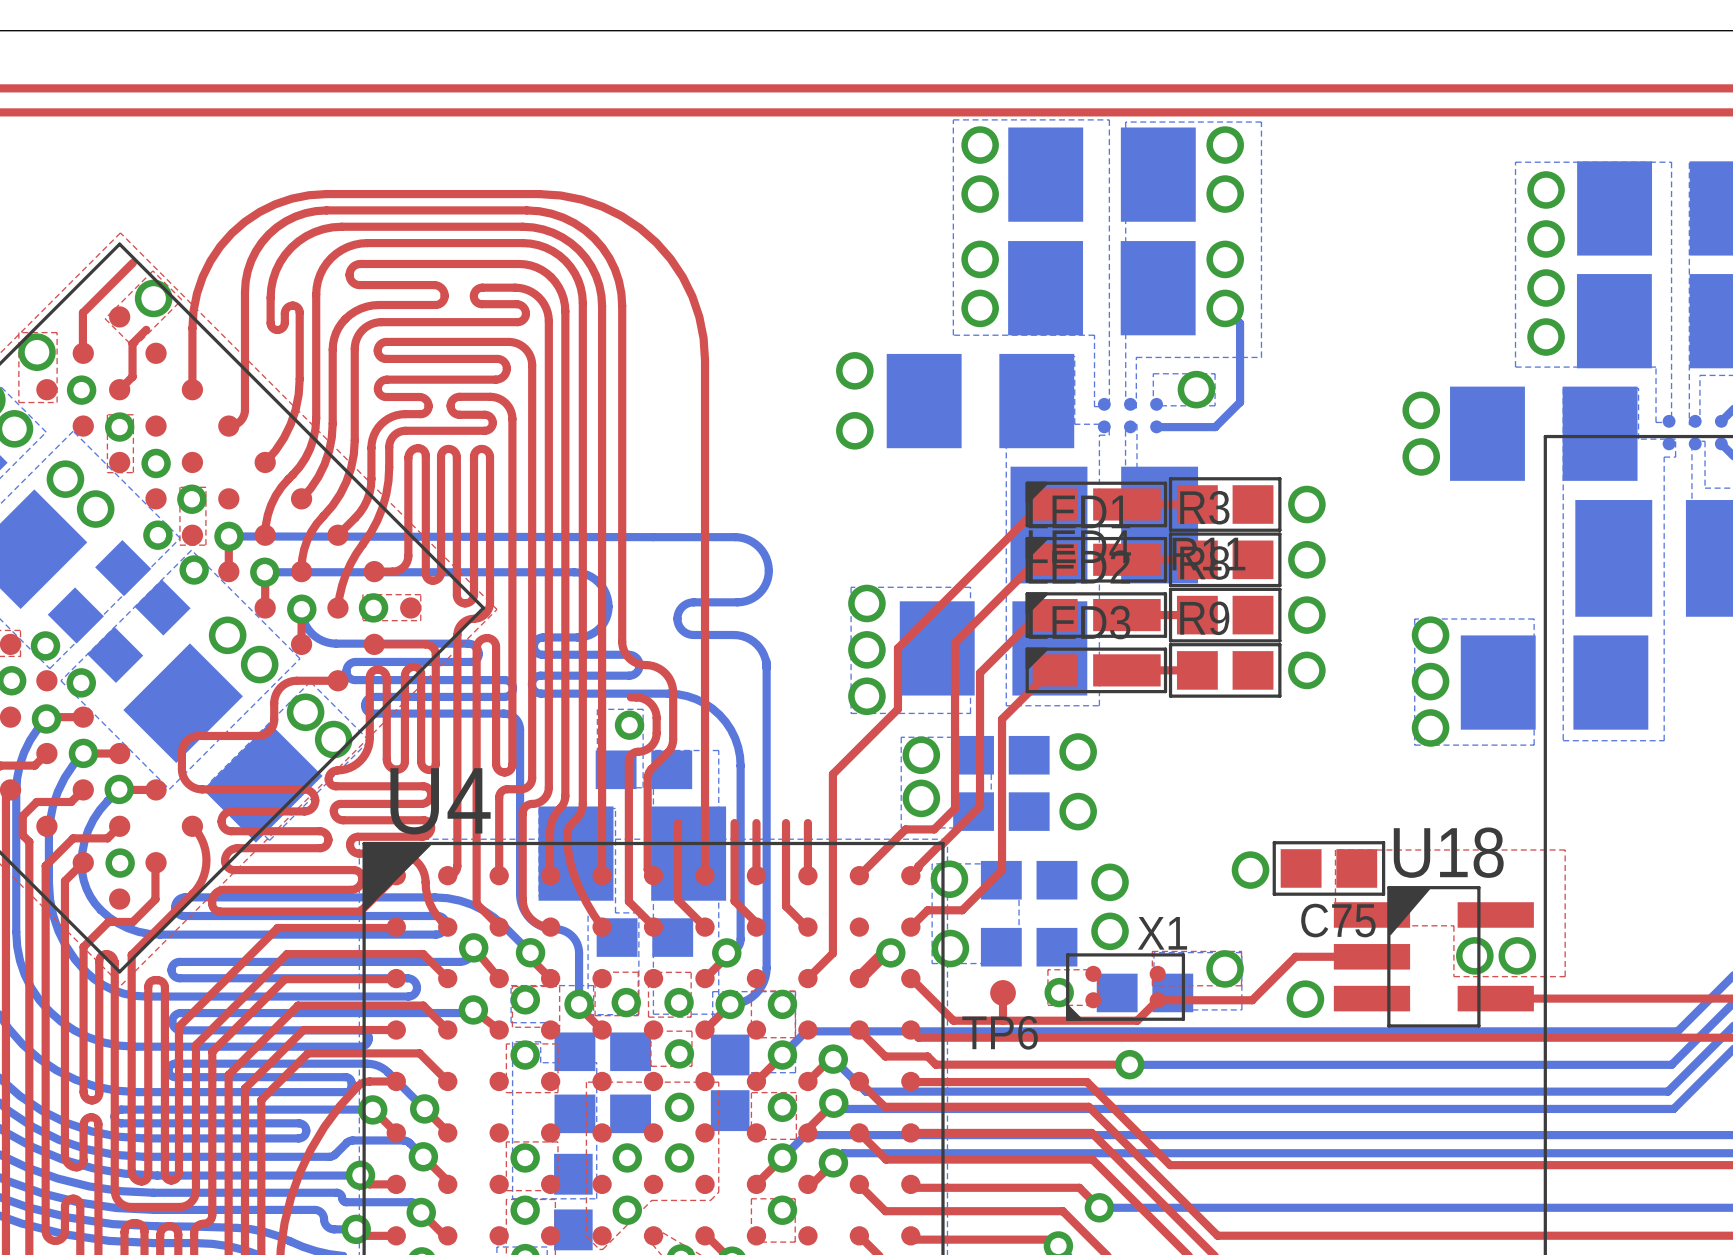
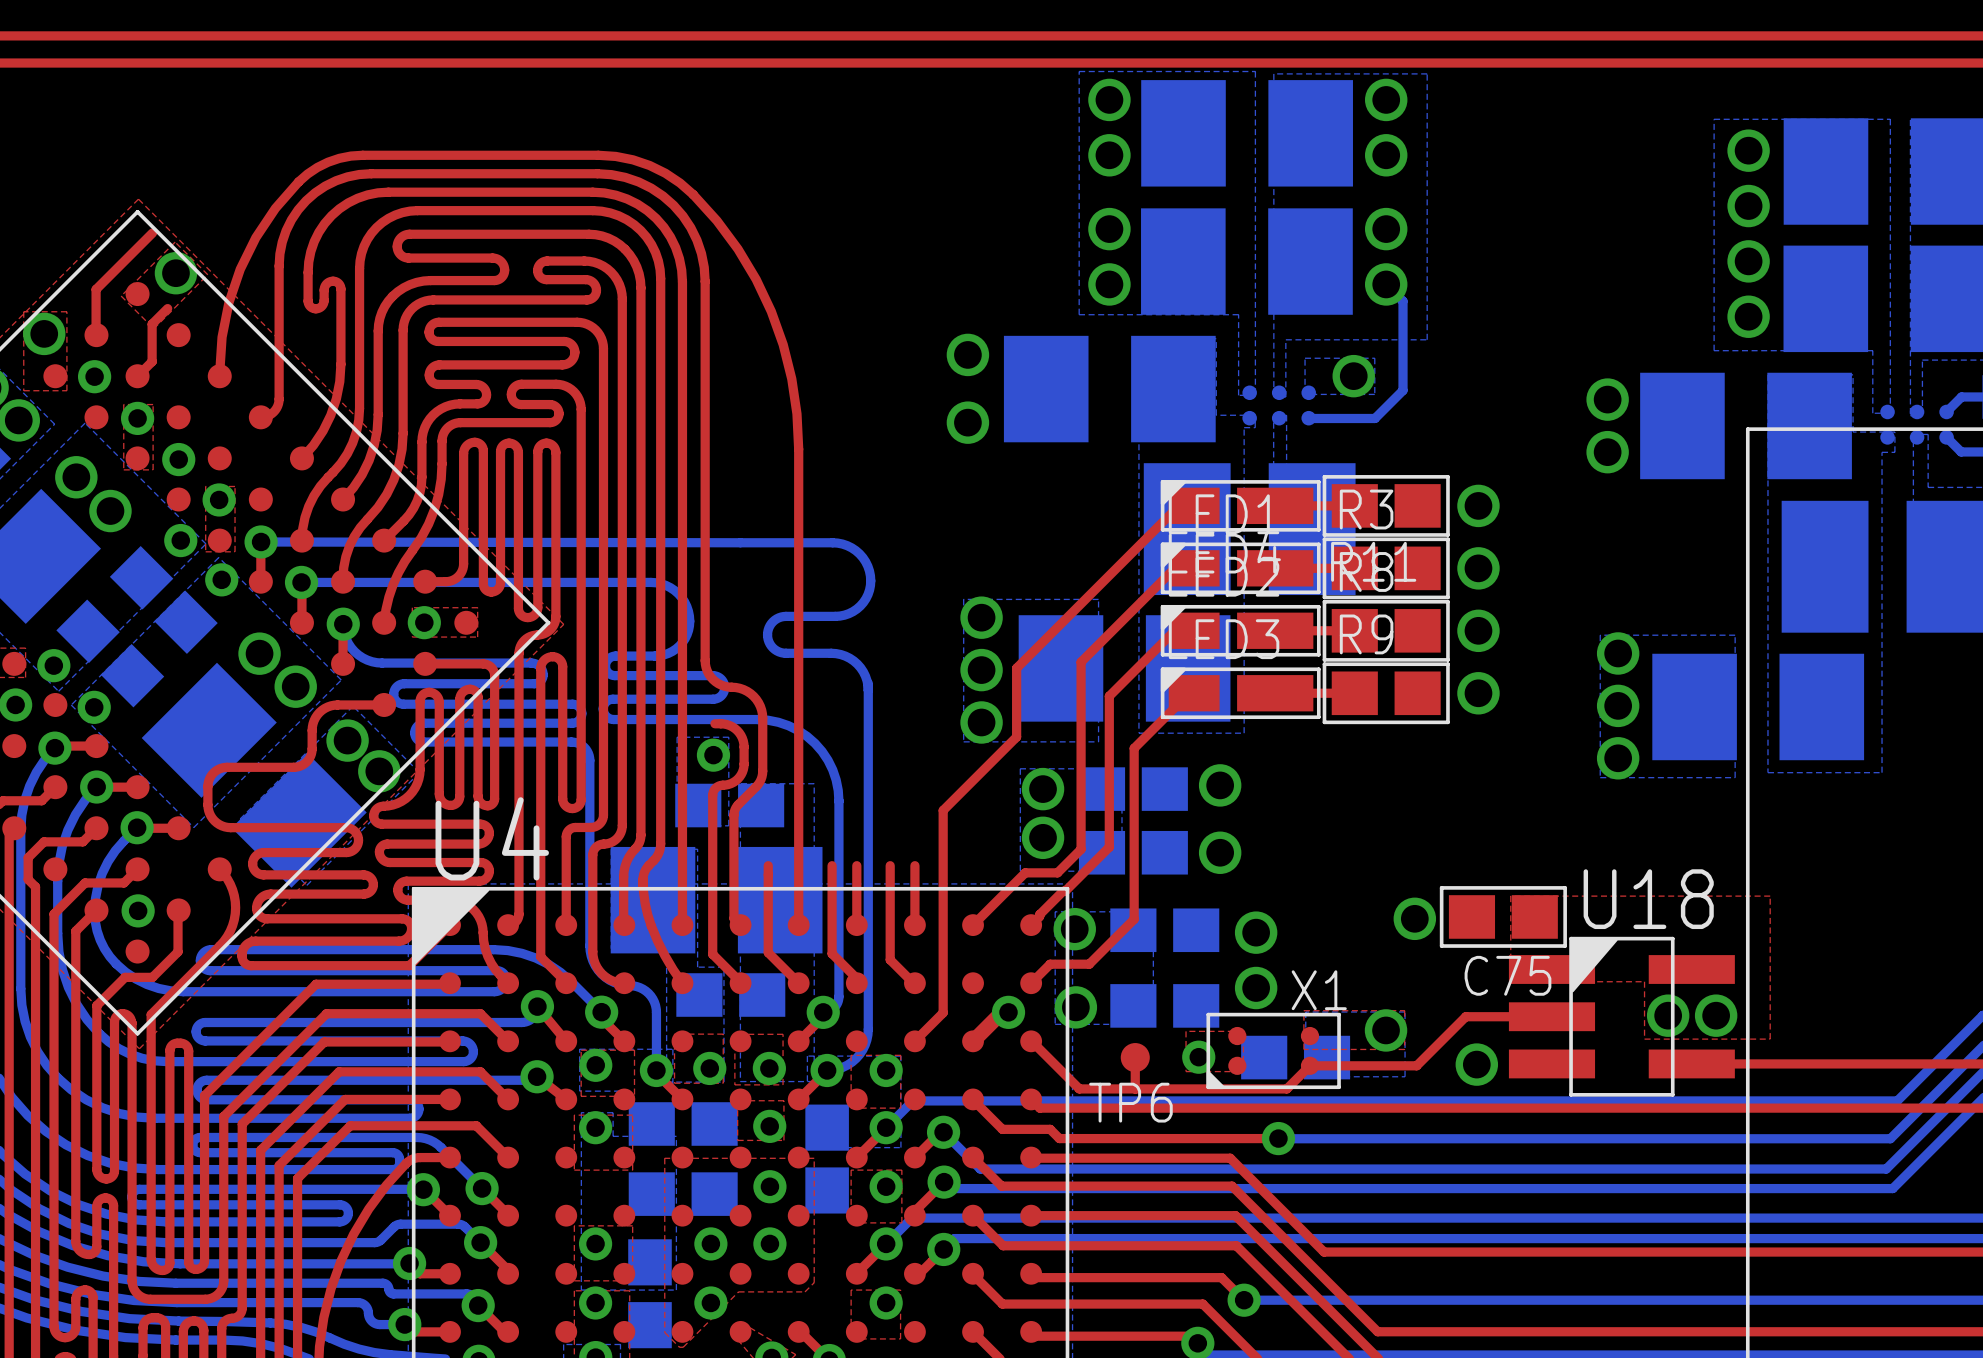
top track: (326, 194) (309, 195) (275, 204) (244, 221) (220, 246) (202, 276) (193, 310) (192, 386) -> (371, 155) (339, 158) (317, 167) (298, 181) (275, 208) (255, 237) (240, 269) (228, 302) (222, 337) (219, 372)
top track: (527, 194) (560, 195) (602, 206) (640, 228) (670, 259) (692, 296) (703, 338) (705, 454) -> (598, 155) (633, 159) (665, 173) (680, 183) (716, 220) (738, 249) (756, 279) (771, 311) (783, 344) (791, 378) (796, 413) (798, 449)

